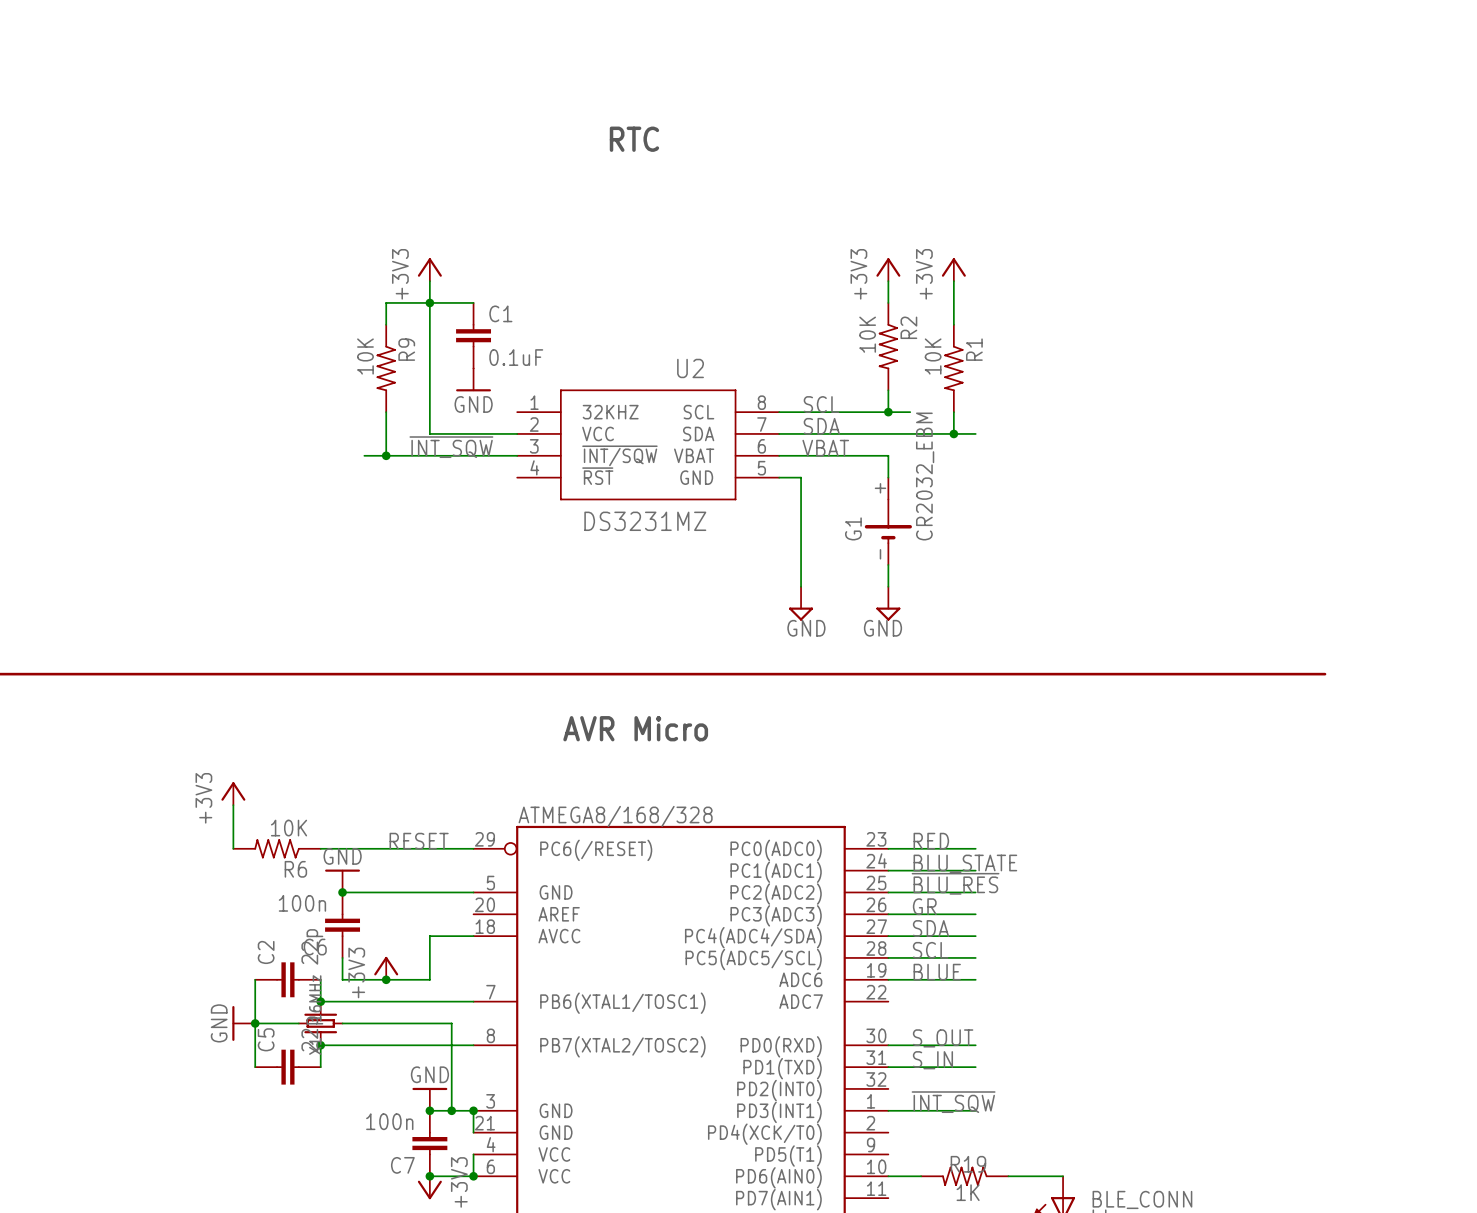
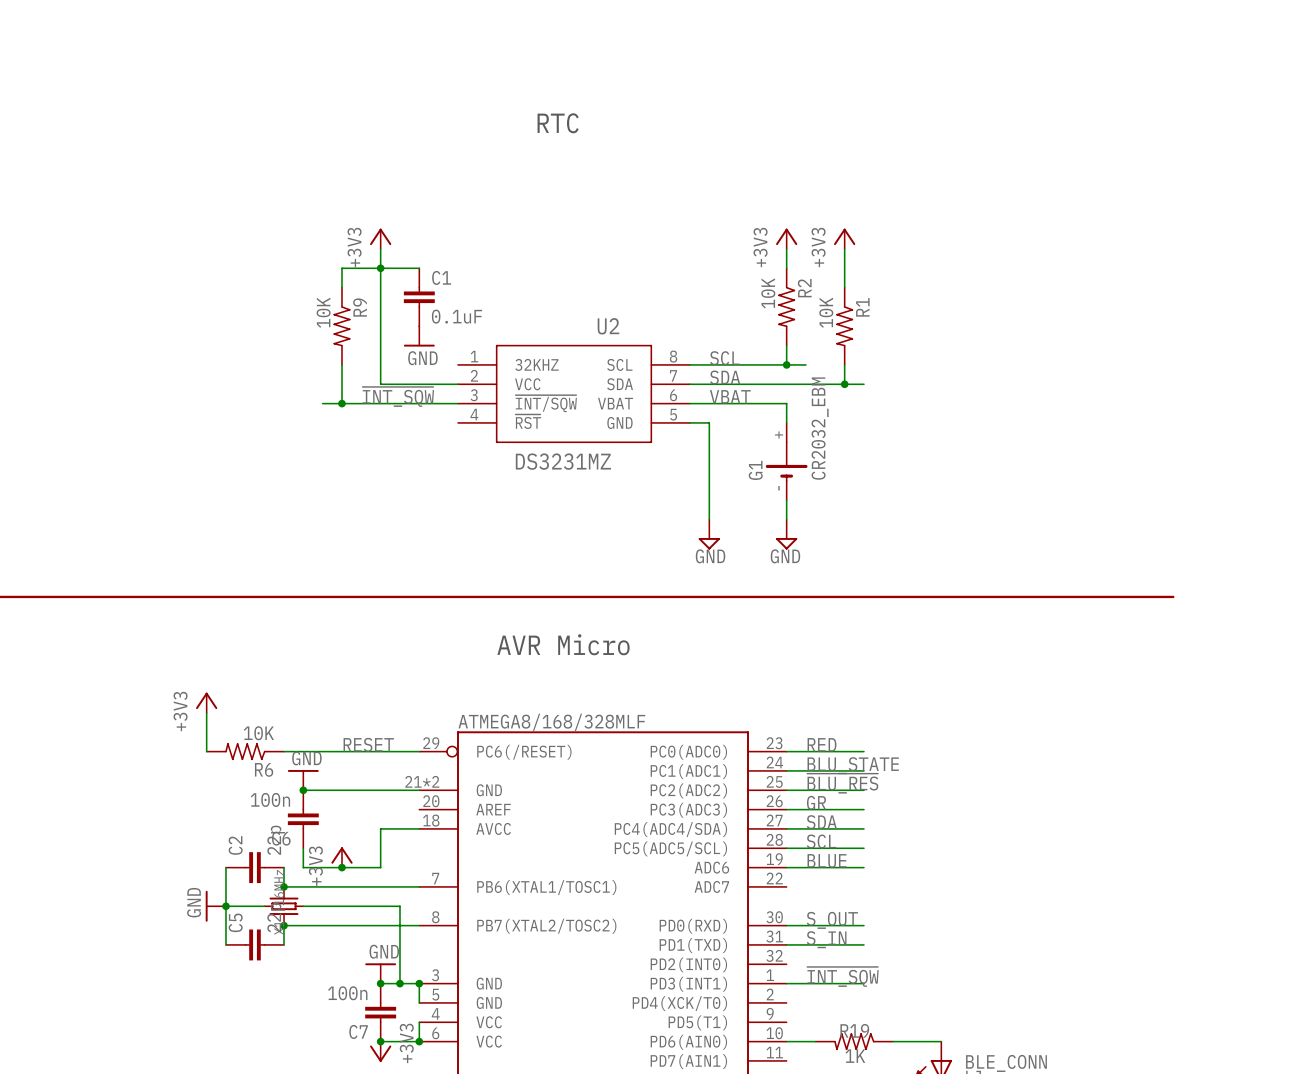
part value: ATMEGA8/168/328 (615, 816) -> ATMEGA8/168/328MLF (551, 722)
part pin number: 5 (490, 883) -> 21*2 (422, 781)
part pin number: 21 (484, 1123) -> 5 (435, 994)

